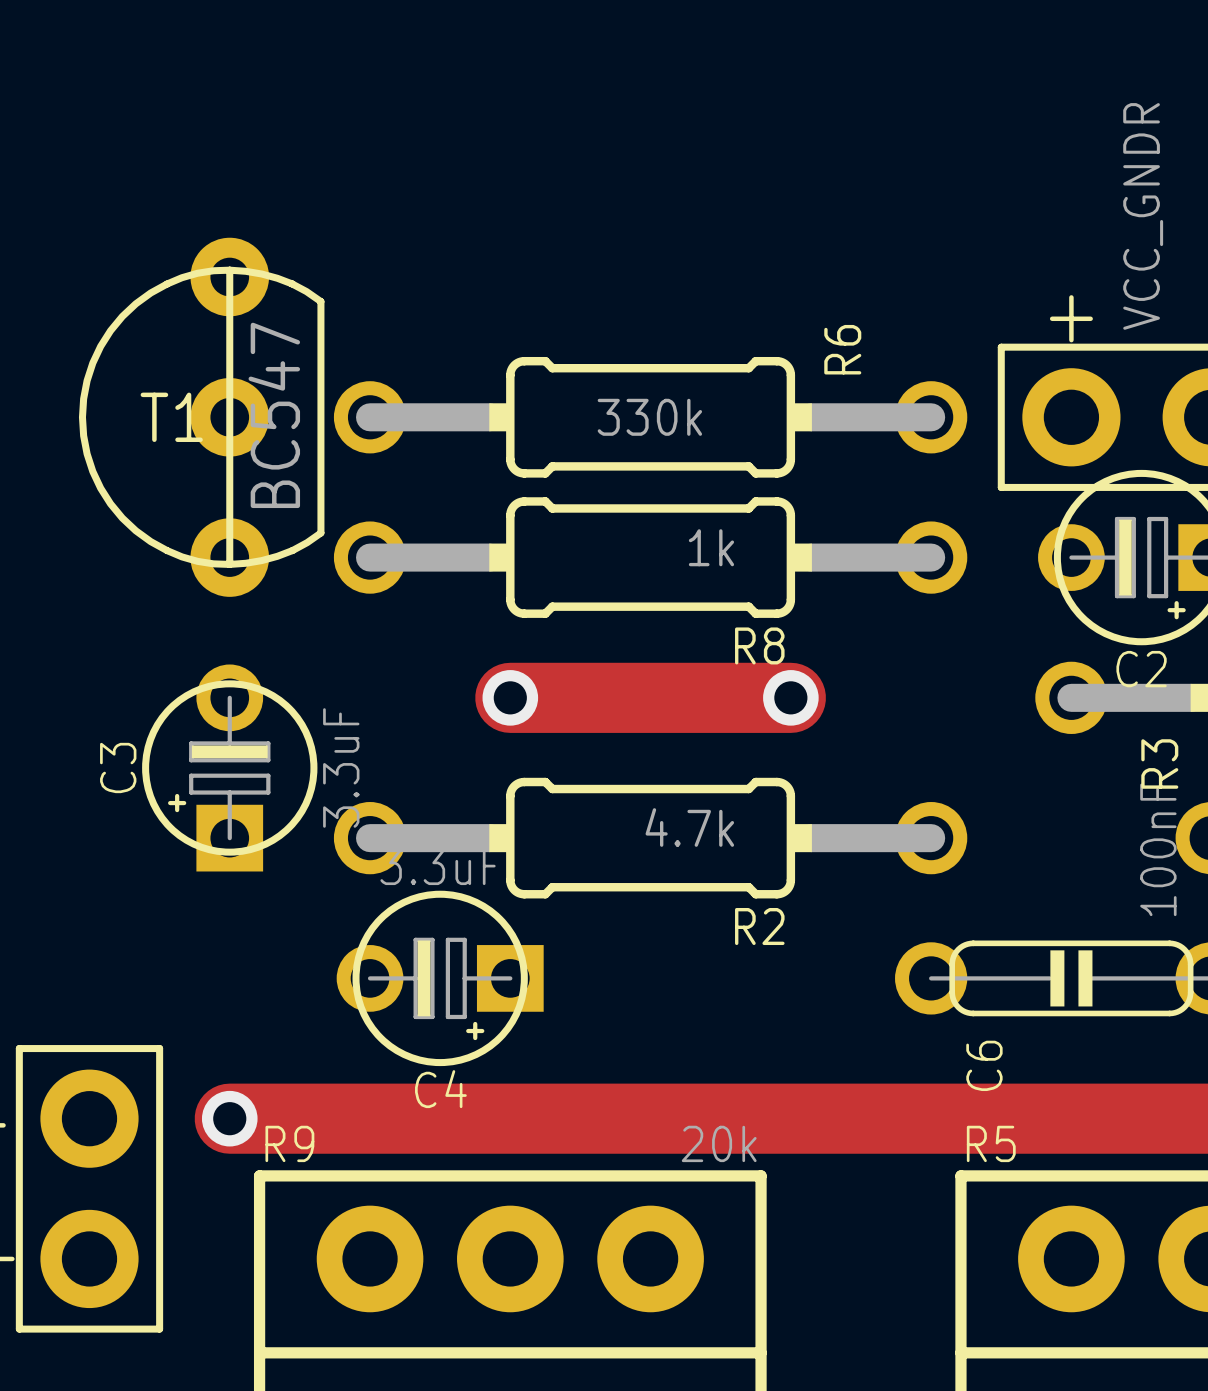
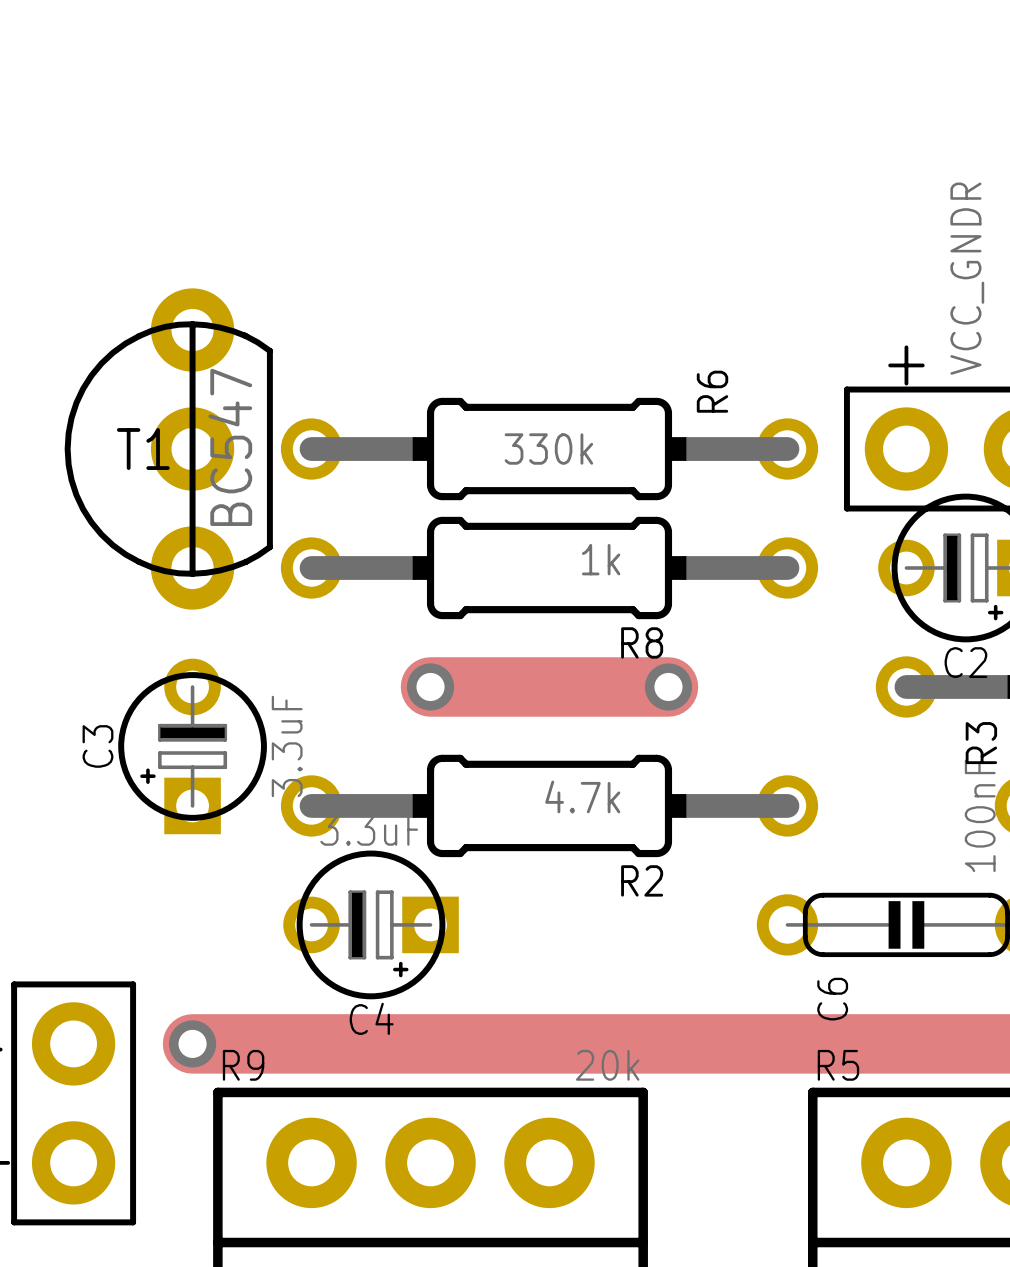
T1 footprint: [78, 237, 325, 597] -> [64, 288, 273, 610]

